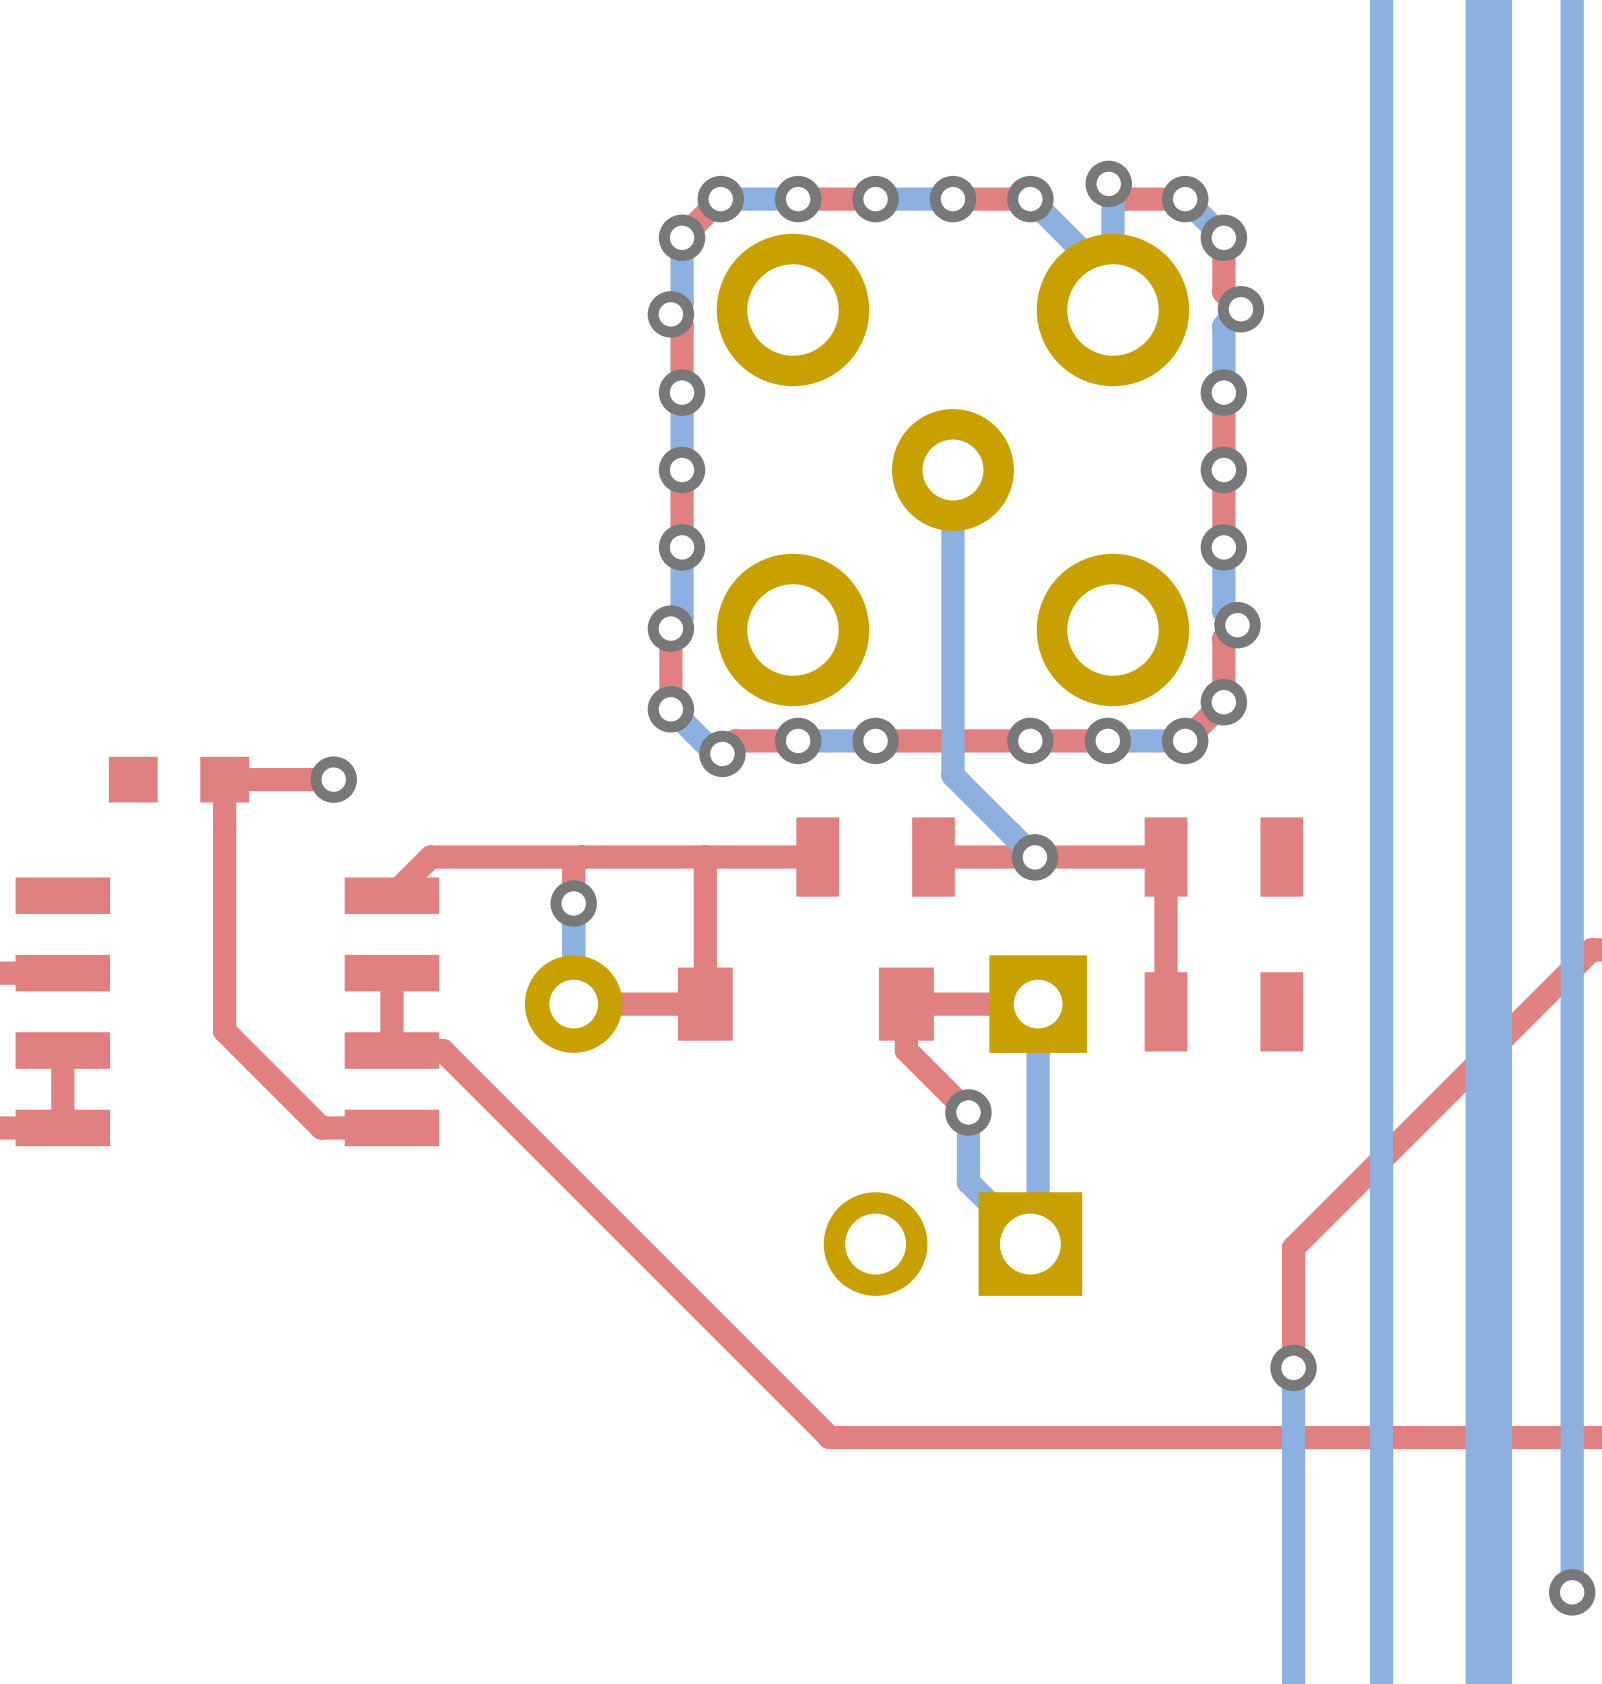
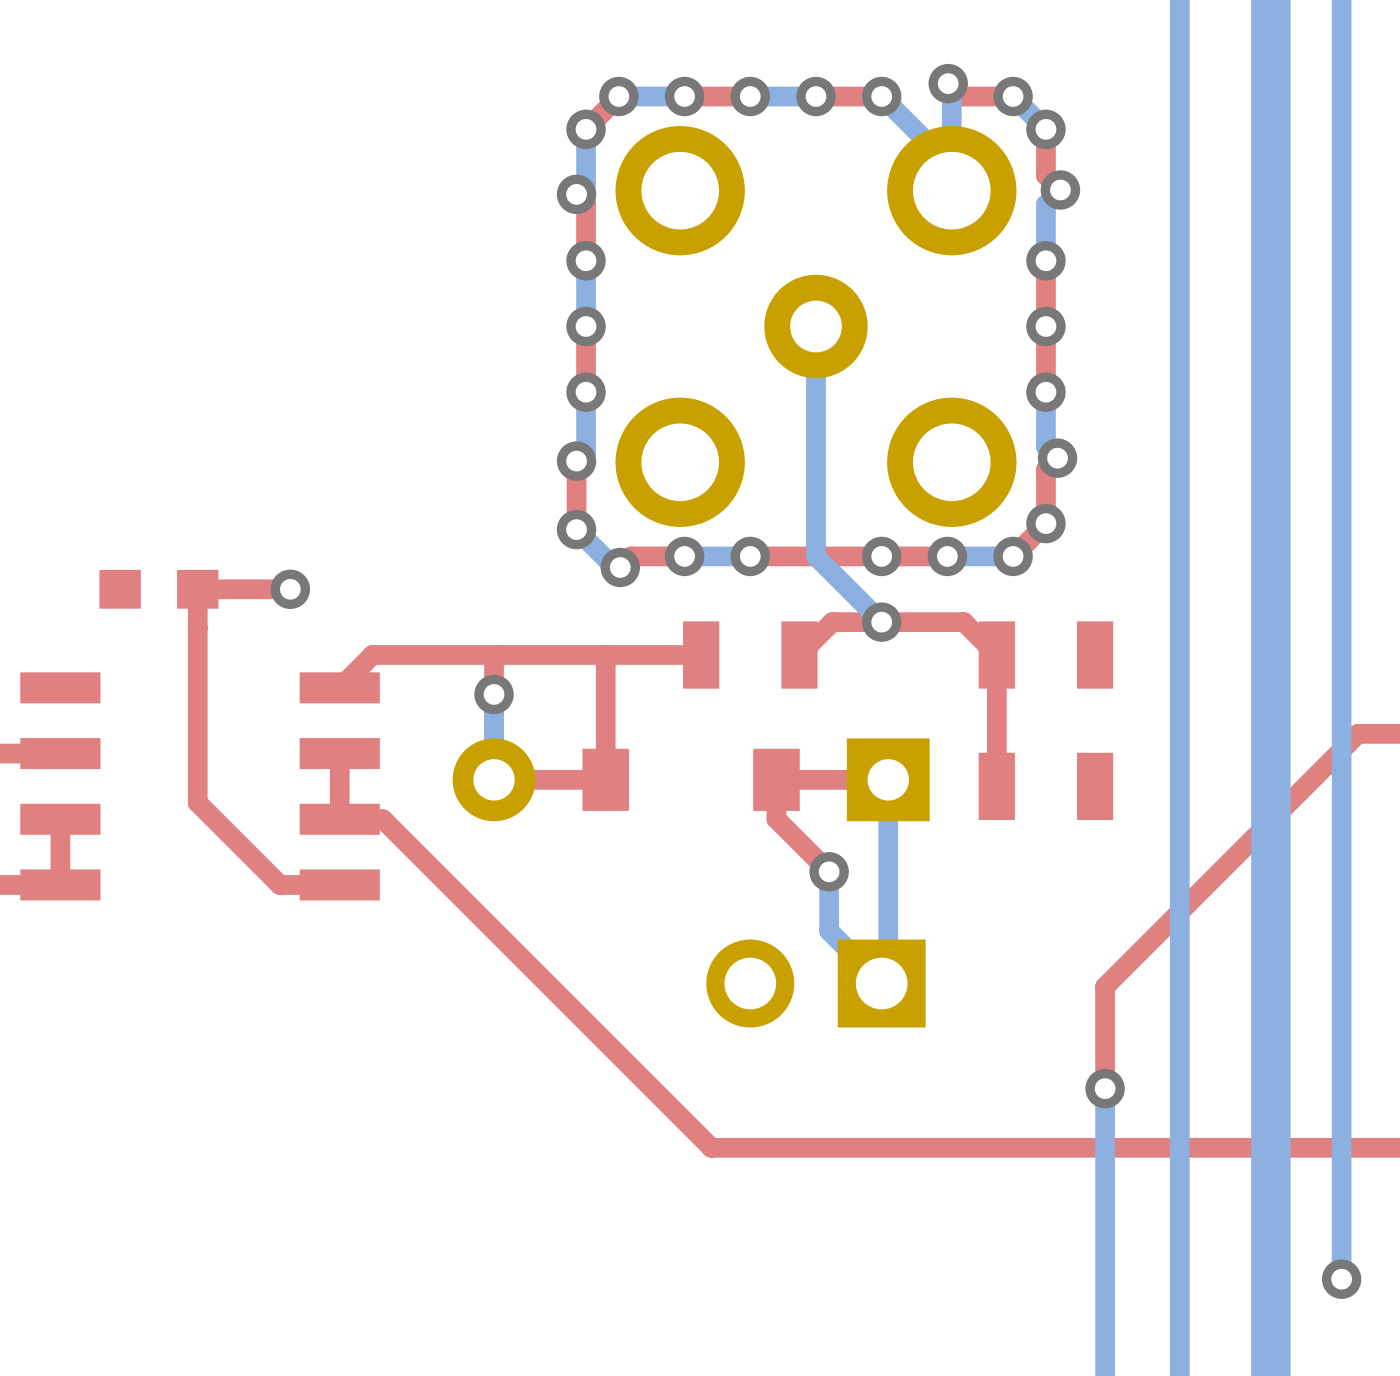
bottom track: (952, 740) (952, 775) (1034, 857) -> (815, 556) (881, 622)
top track: (1034, 857) (933, 857) -> none
via position: (1034, 857) -> (881, 622)
top track: (1165, 857) (1035, 857) -> (996, 655) (963, 622) (832, 622) (799, 655)

